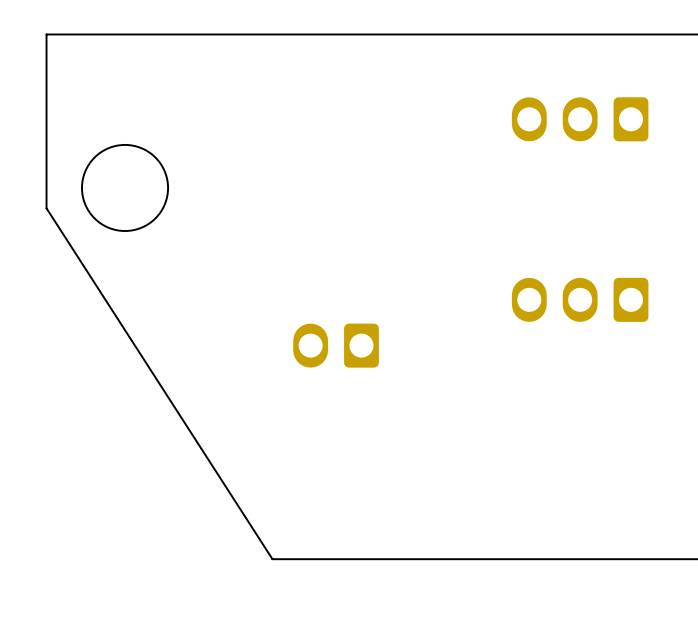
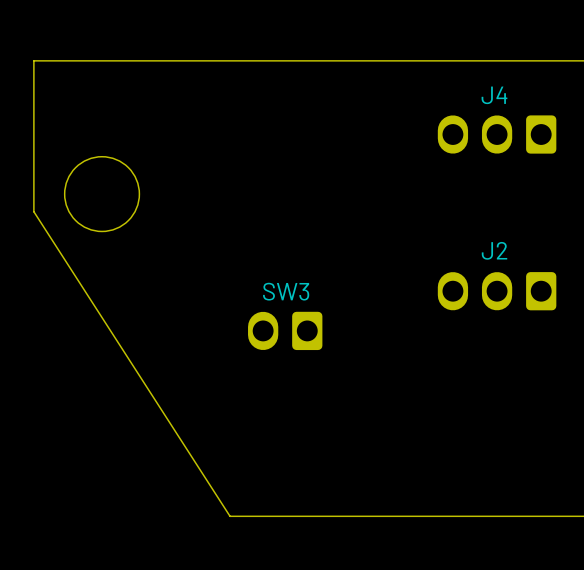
J4 name: none -> J4 (494, 95)
J2 name: none -> J2 (494, 250)
SW3 name: none -> SW3 (286, 291)

